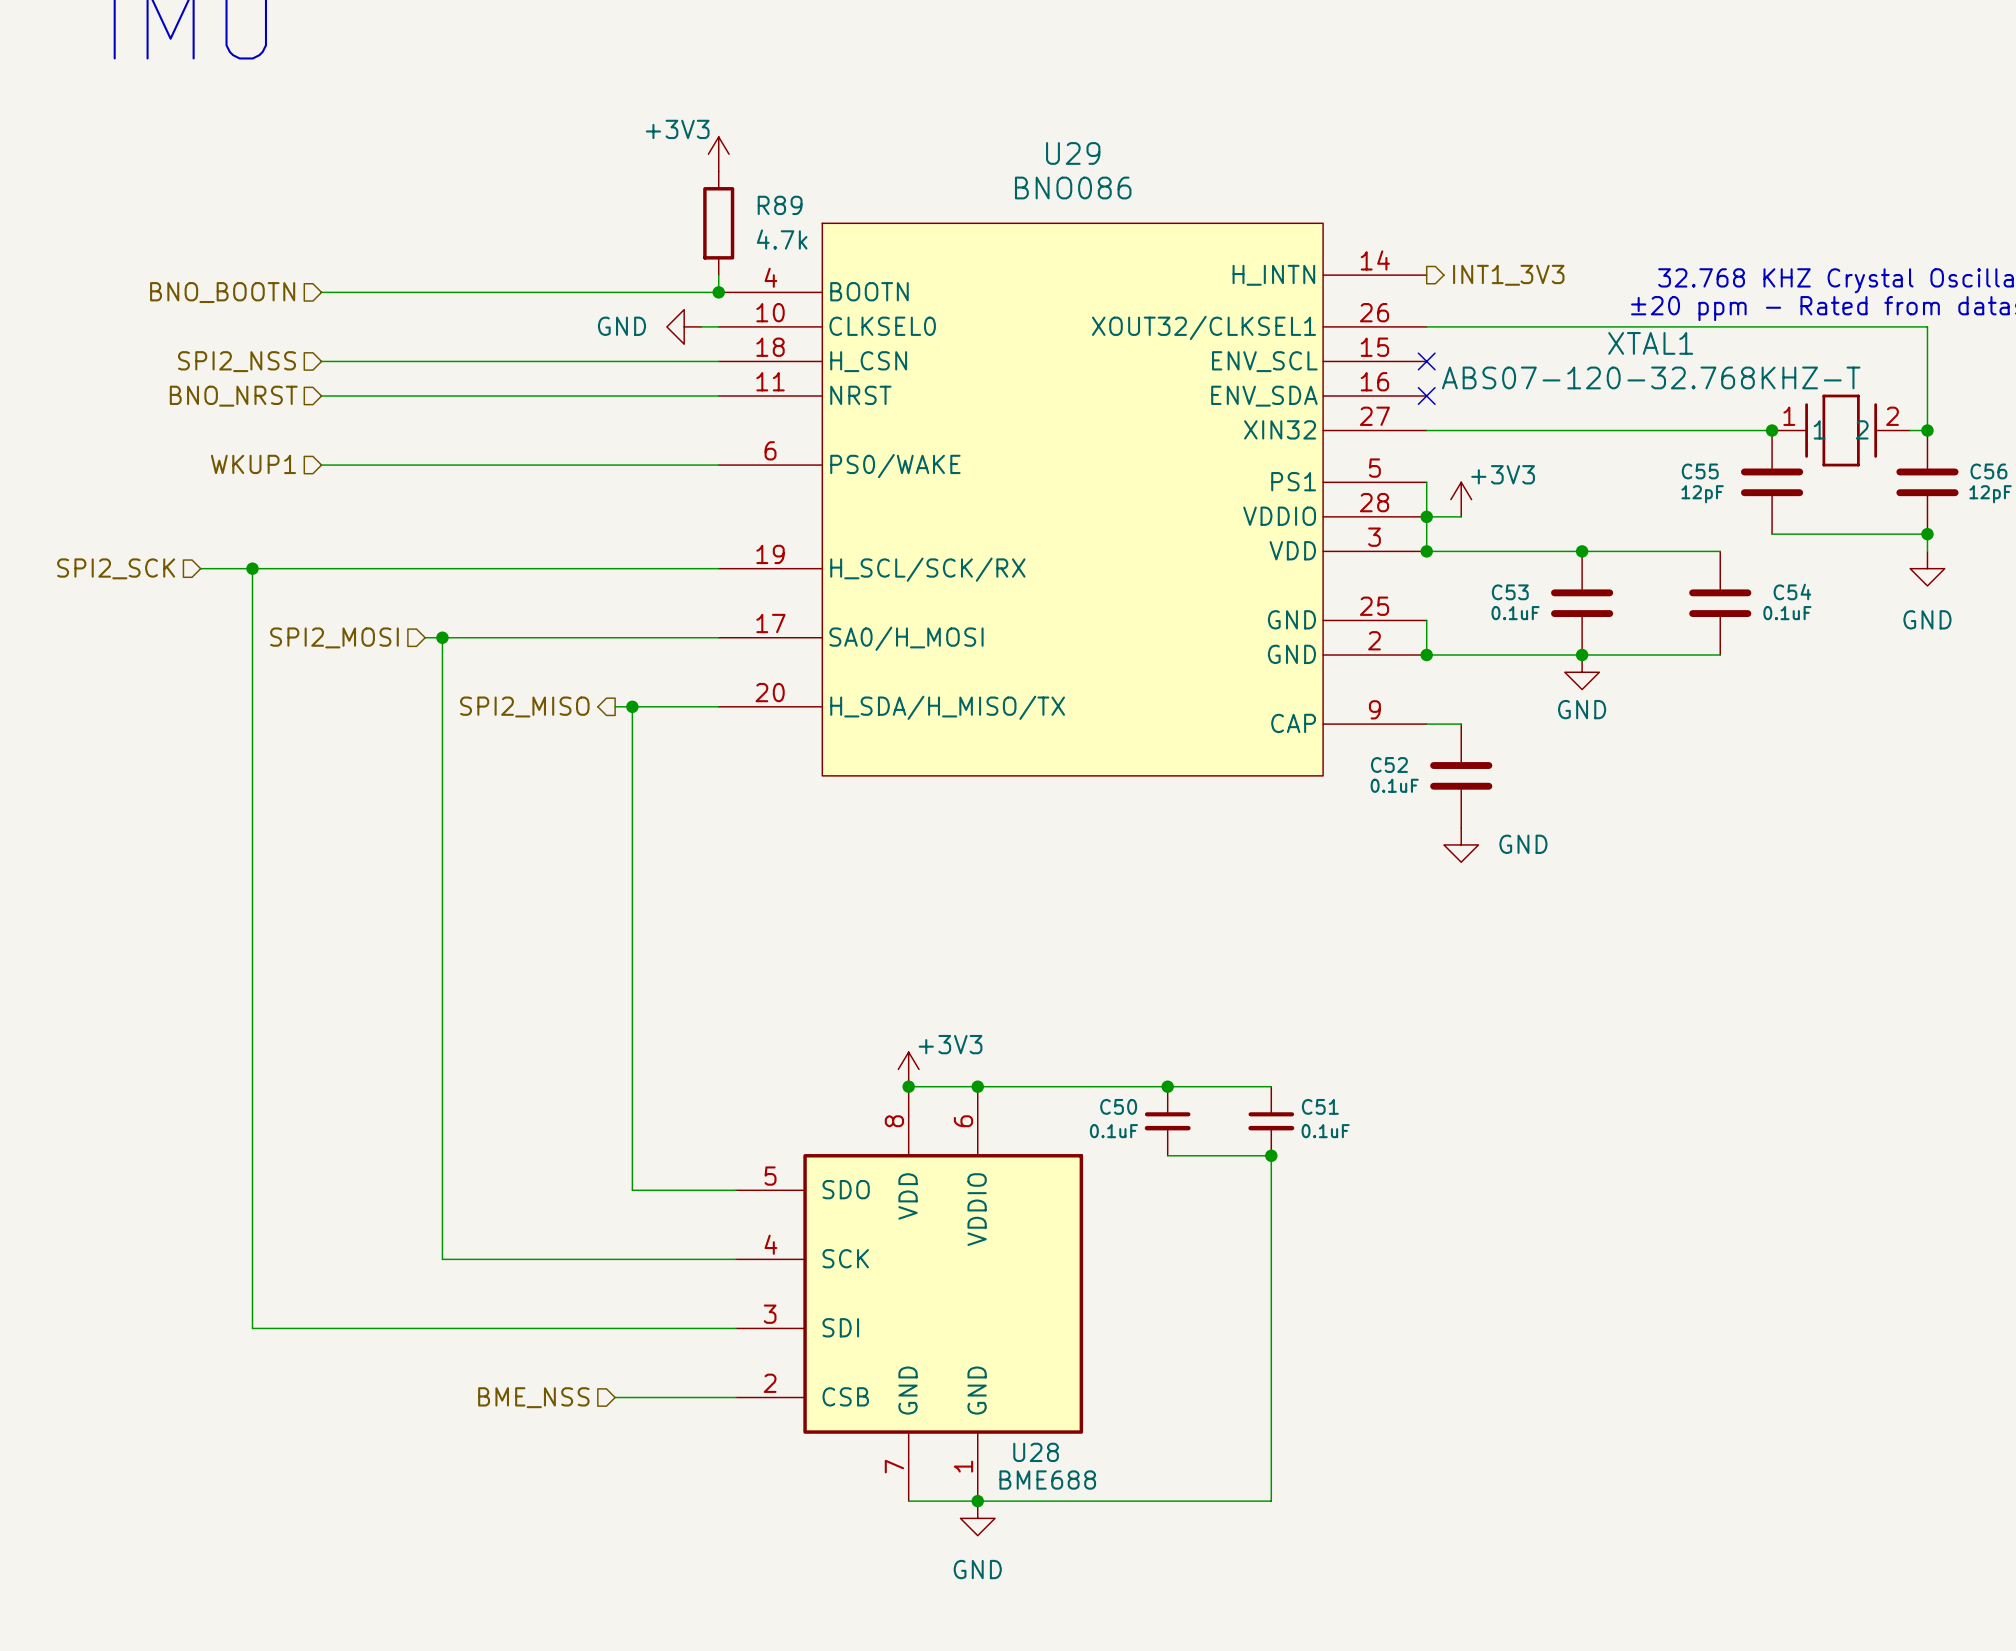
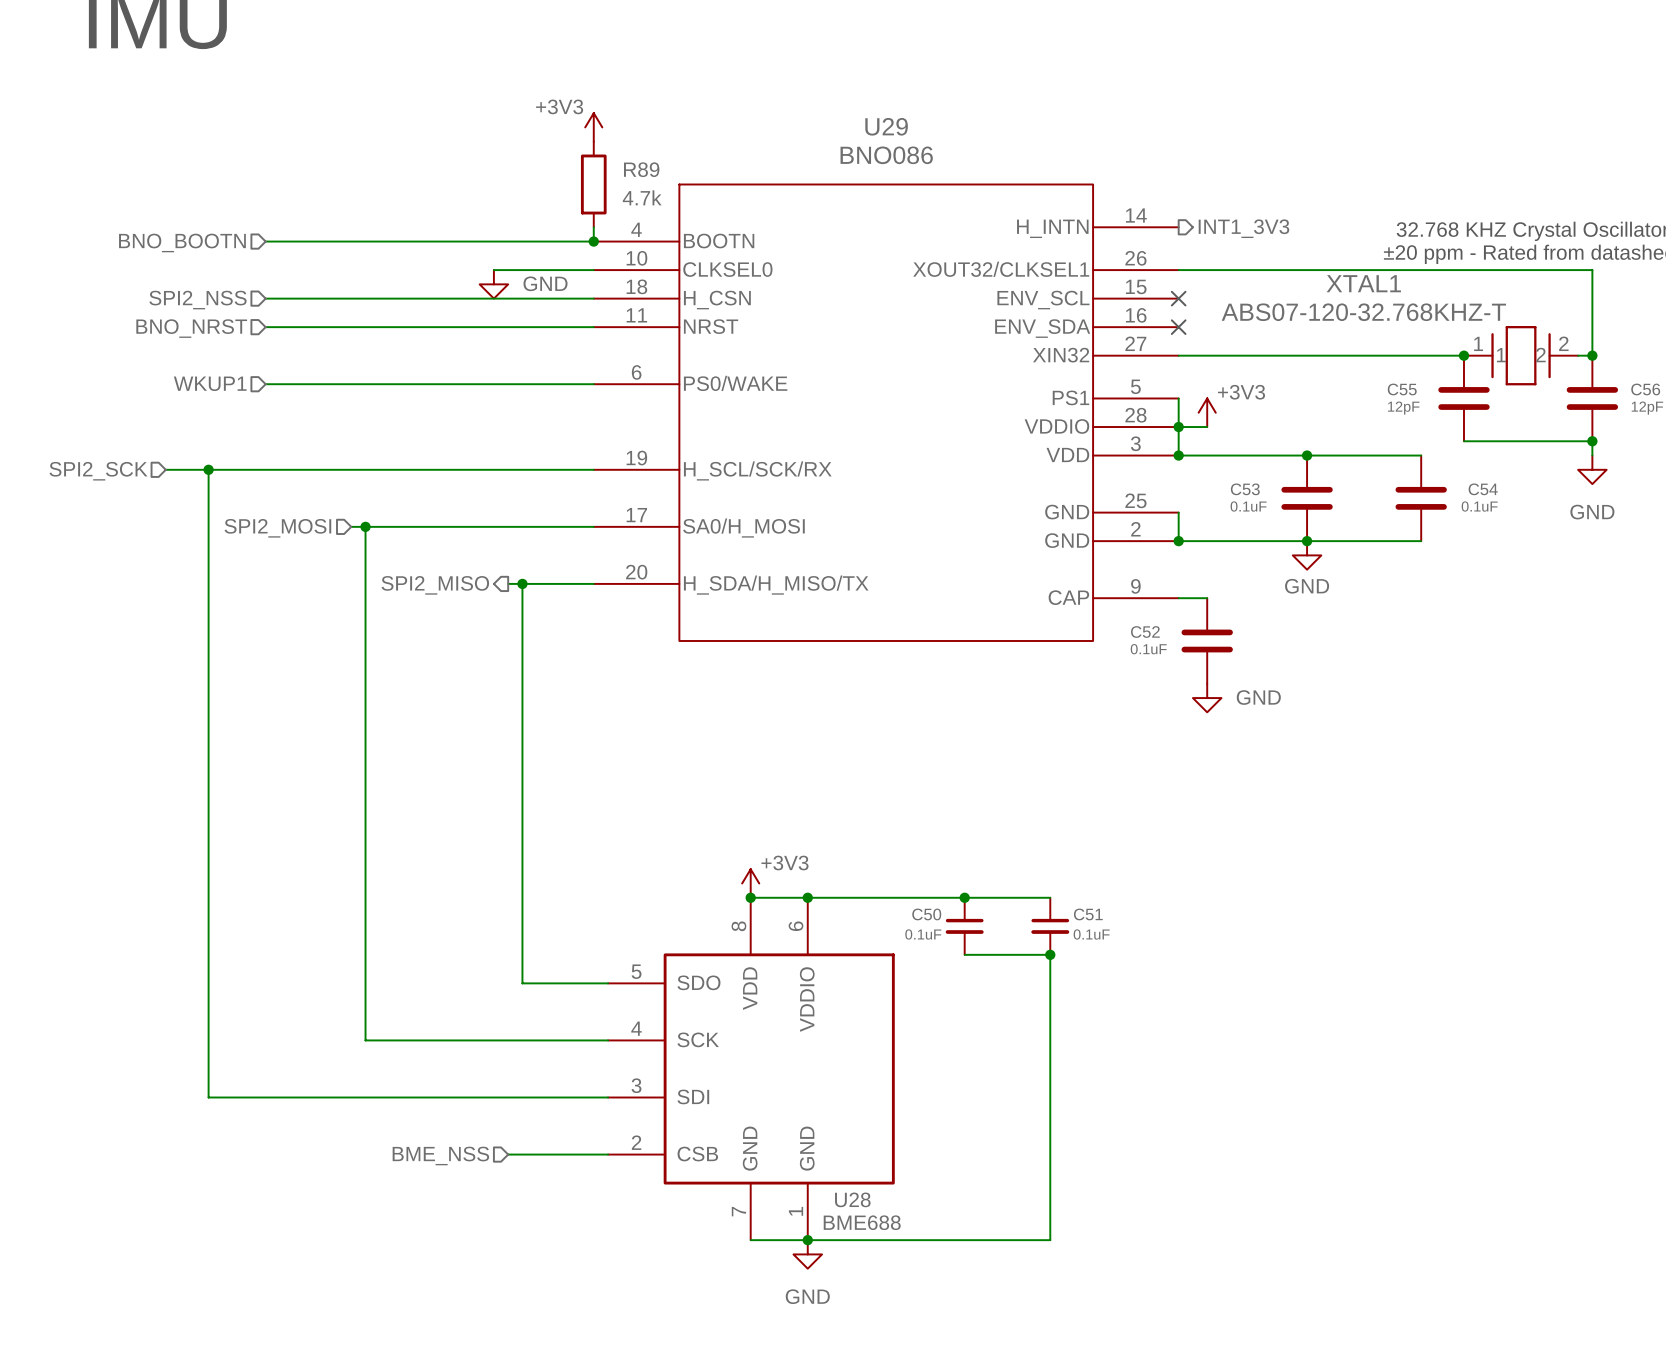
wire: none -> (493, 270) (579, 270)
power symbol text position: GND (621, 326) -> GND (545, 283)
power symbol rotation: 0° (684, 326) -> 90° counterclockwise (493, 284)
power symbol position: GND (684, 326) -> GND (493, 284)

